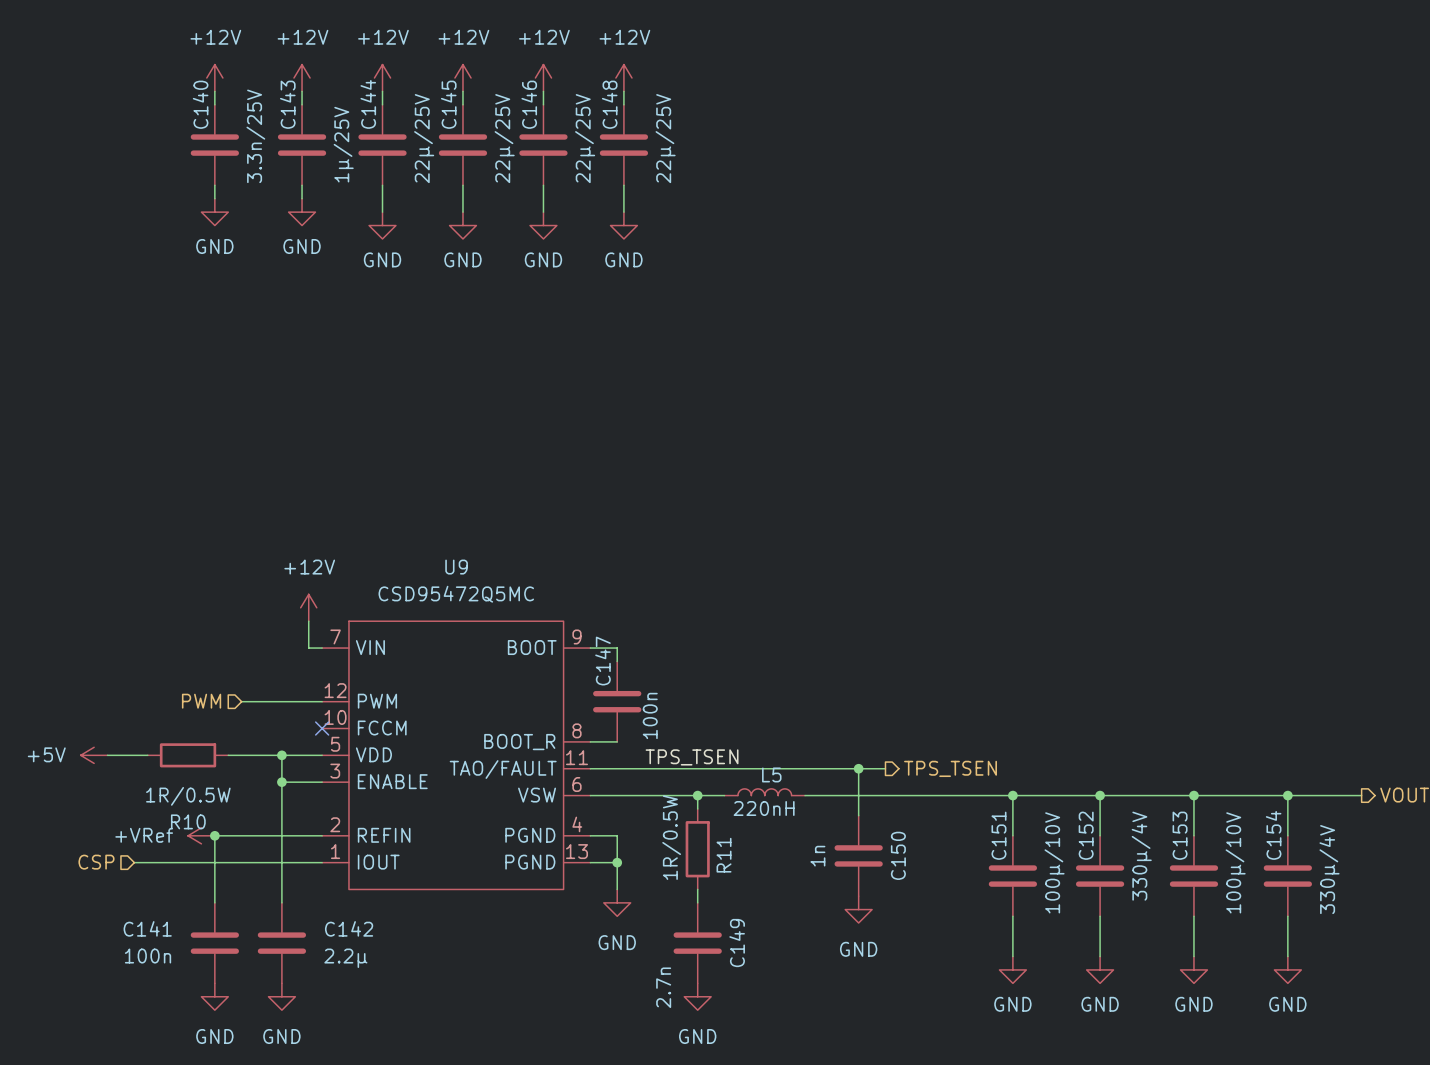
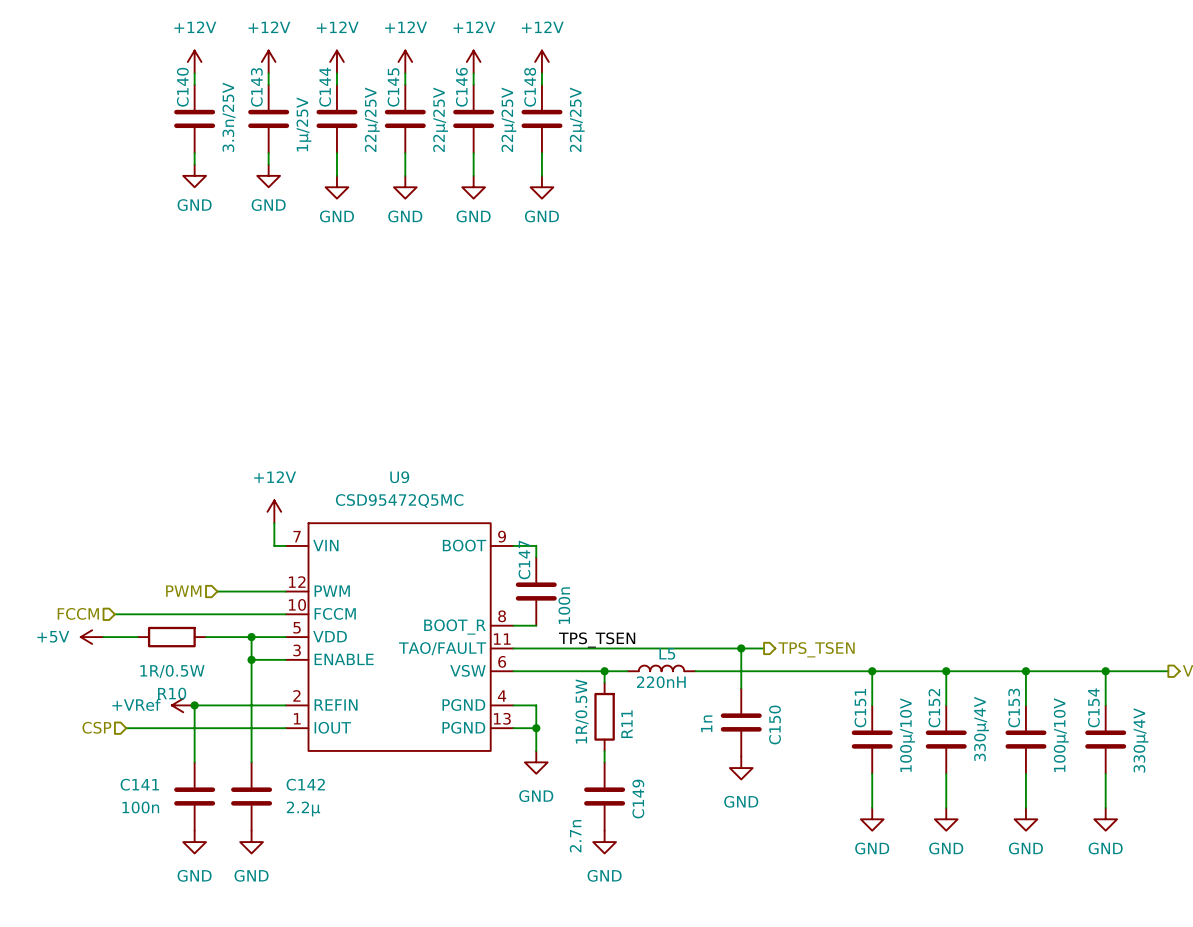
hierarchical label: none -> FCCM (78, 613)
wire: none -> (114, 614) (285, 614)
no-connect mark: (322, 728) -> none

